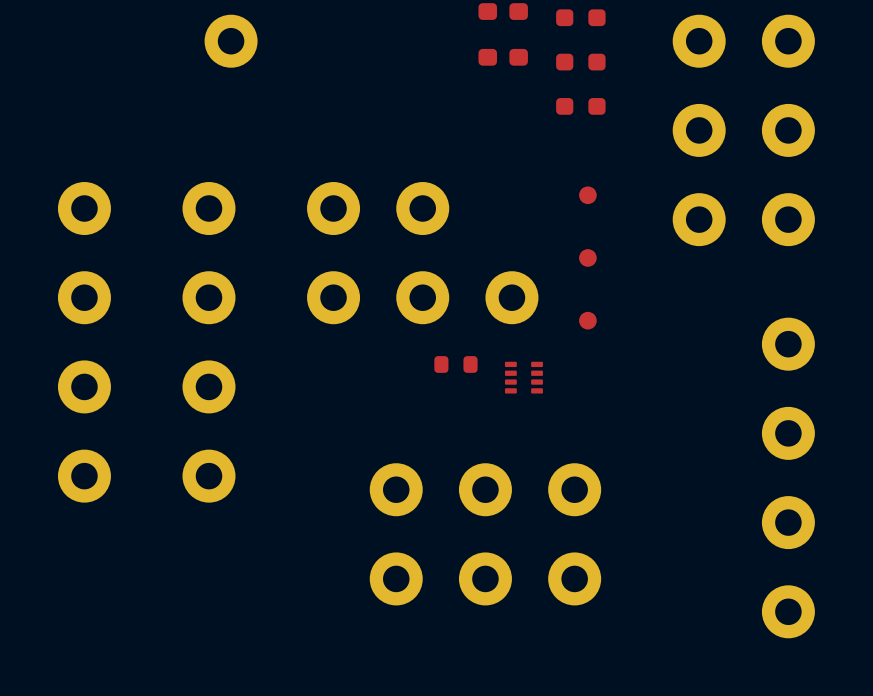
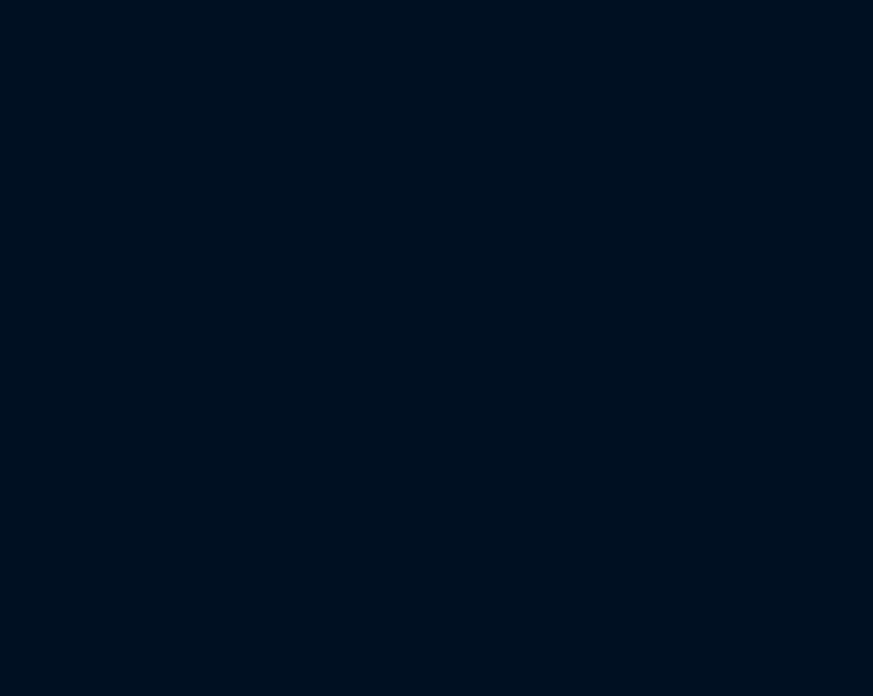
part: (503, 11) -> none
part: (580, 17) -> none
part: (231, 41) -> none
part: (699, 41) -> none
part: (788, 41) -> none
part: (503, 57) -> none
part: (580, 62) -> none
part: (580, 106) -> none
part: (699, 130) -> none
part: (788, 130) -> none
part: (587, 195) -> none
part: (84, 208) -> none
part: (209, 208) -> none
part: (333, 208) -> none
part: (422, 208) -> none
part: (699, 219) -> none
part: (788, 219) -> none
part: (587, 257) -> none
part: (84, 297) -> none
part: (209, 297) -> none
part: (333, 297) -> none
part: (422, 297) -> none
part: (511, 297) -> none
part: (587, 320) -> none
part: (788, 344) -> none
part: (455, 364) -> none
part: (523, 377) -> none
part: (84, 386) -> none
part: (209, 386) -> none
part: (788, 433) -> none
part: (84, 476) -> none
part: (209, 476) -> none
part: (396, 489) -> none
part: (485, 489) -> none
part: (574, 489) -> none
part: (788, 522) -> none
part: (396, 578) -> none
part: (485, 578) -> none
part: (574, 578) -> none
part: (788, 611) -> none

